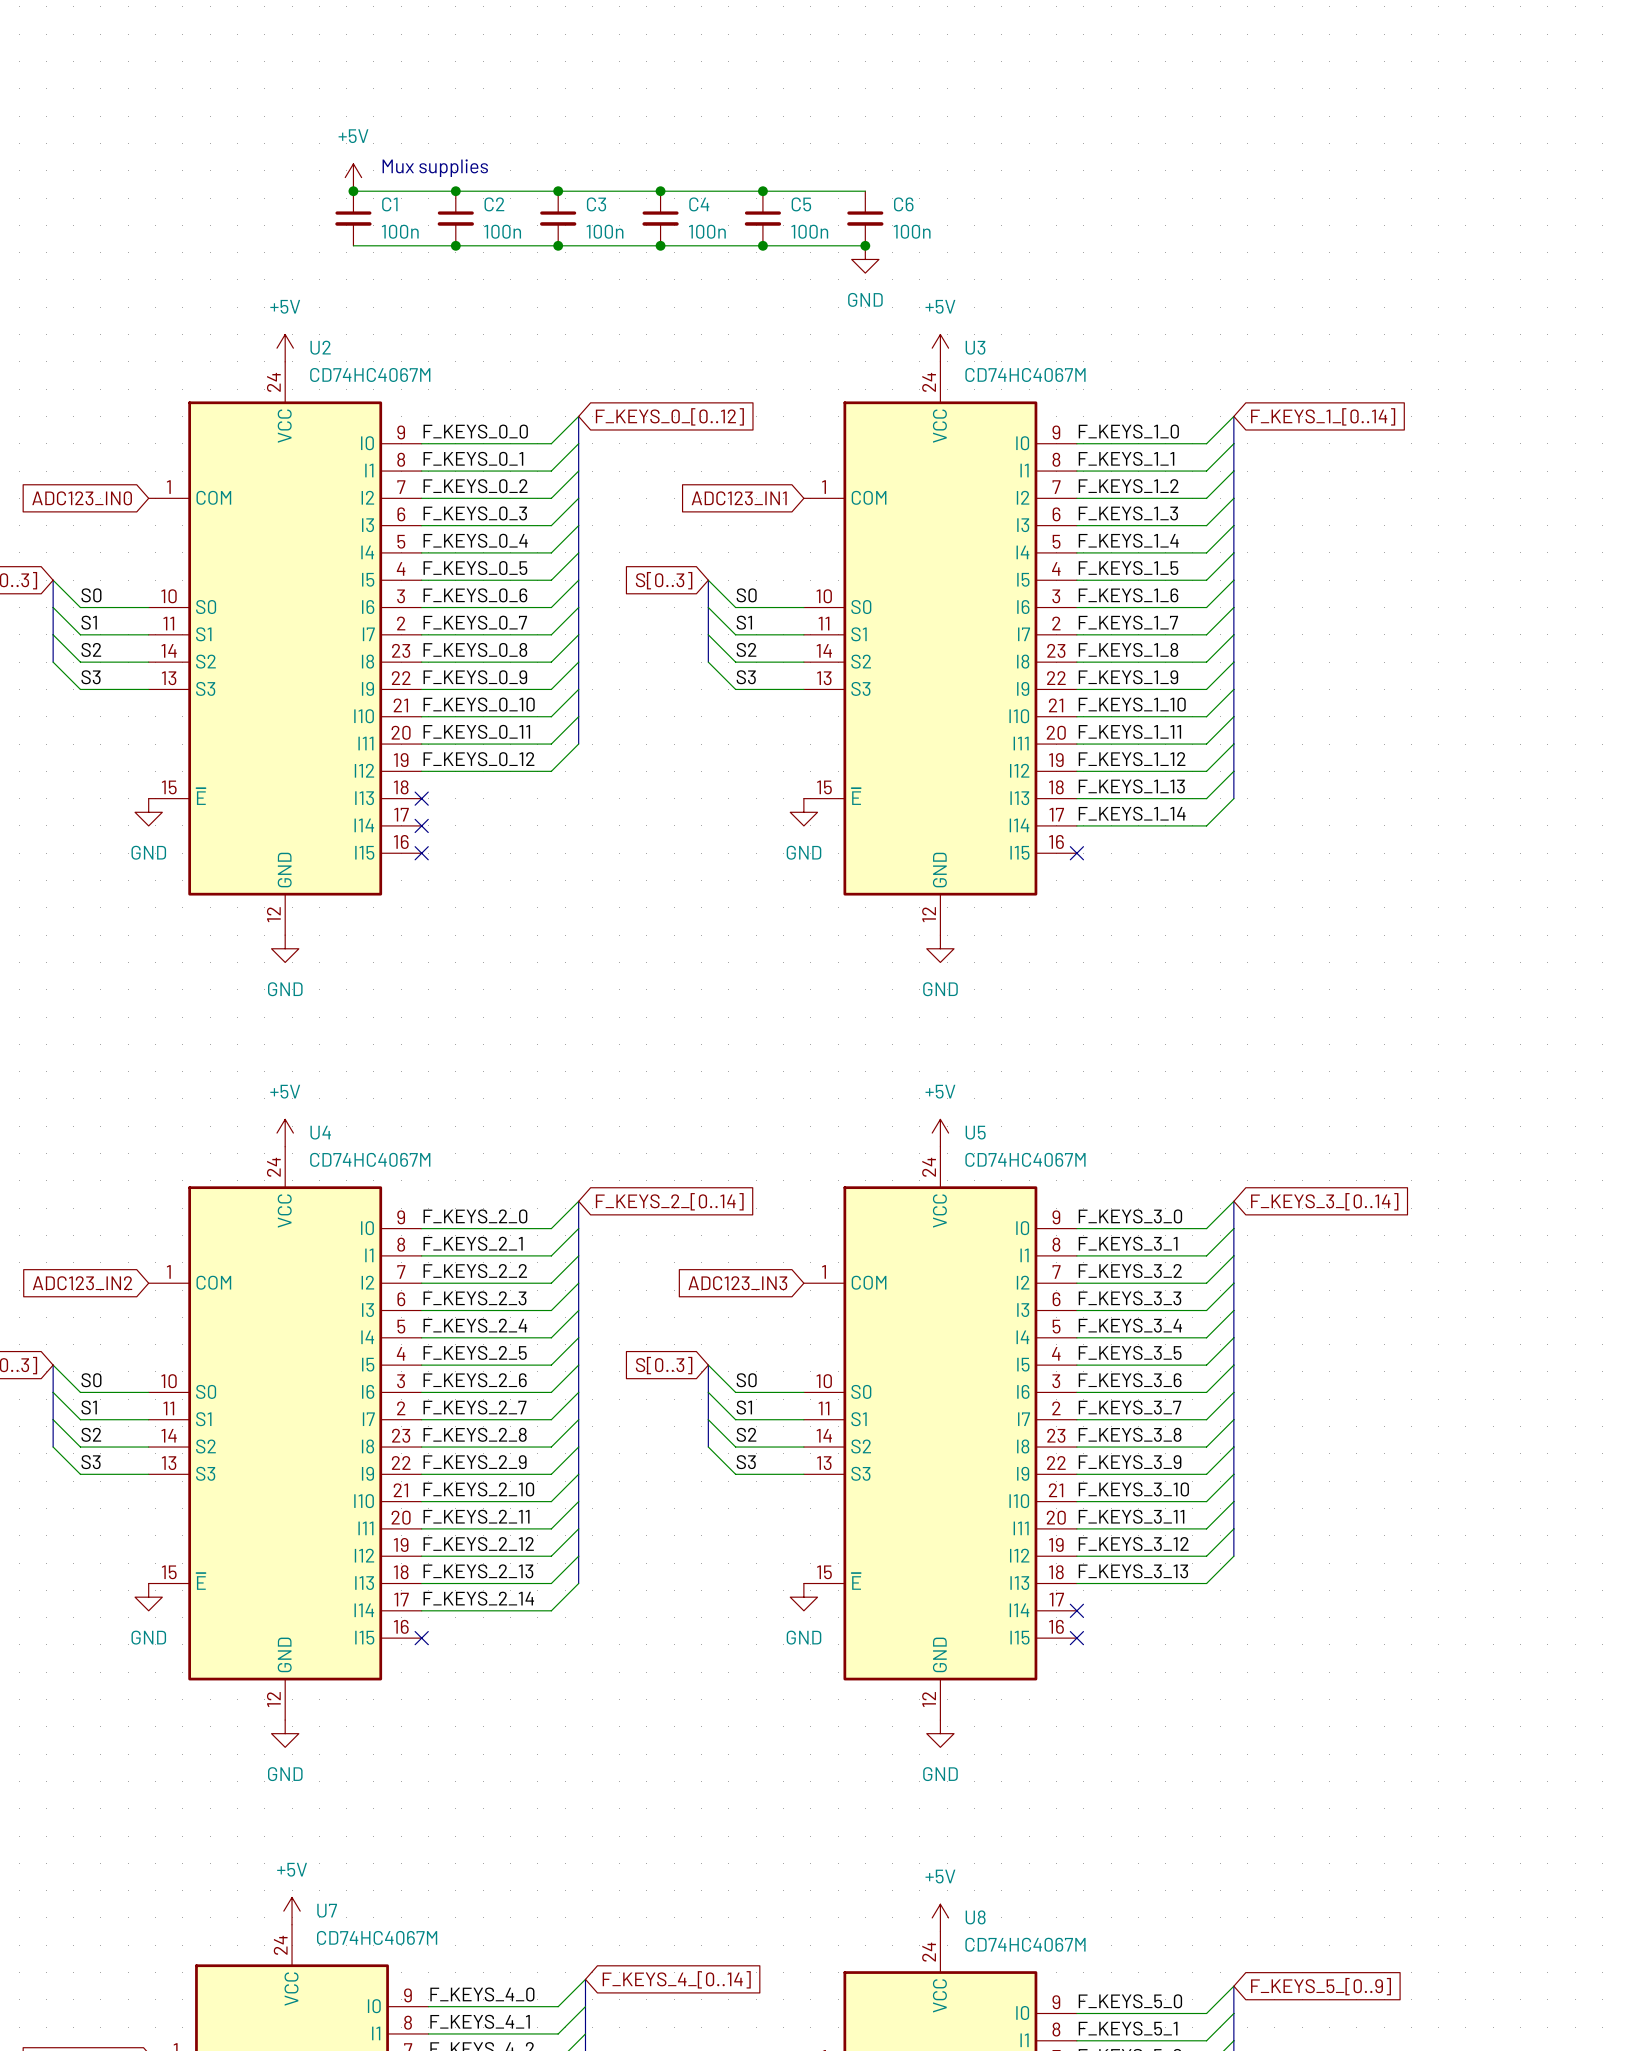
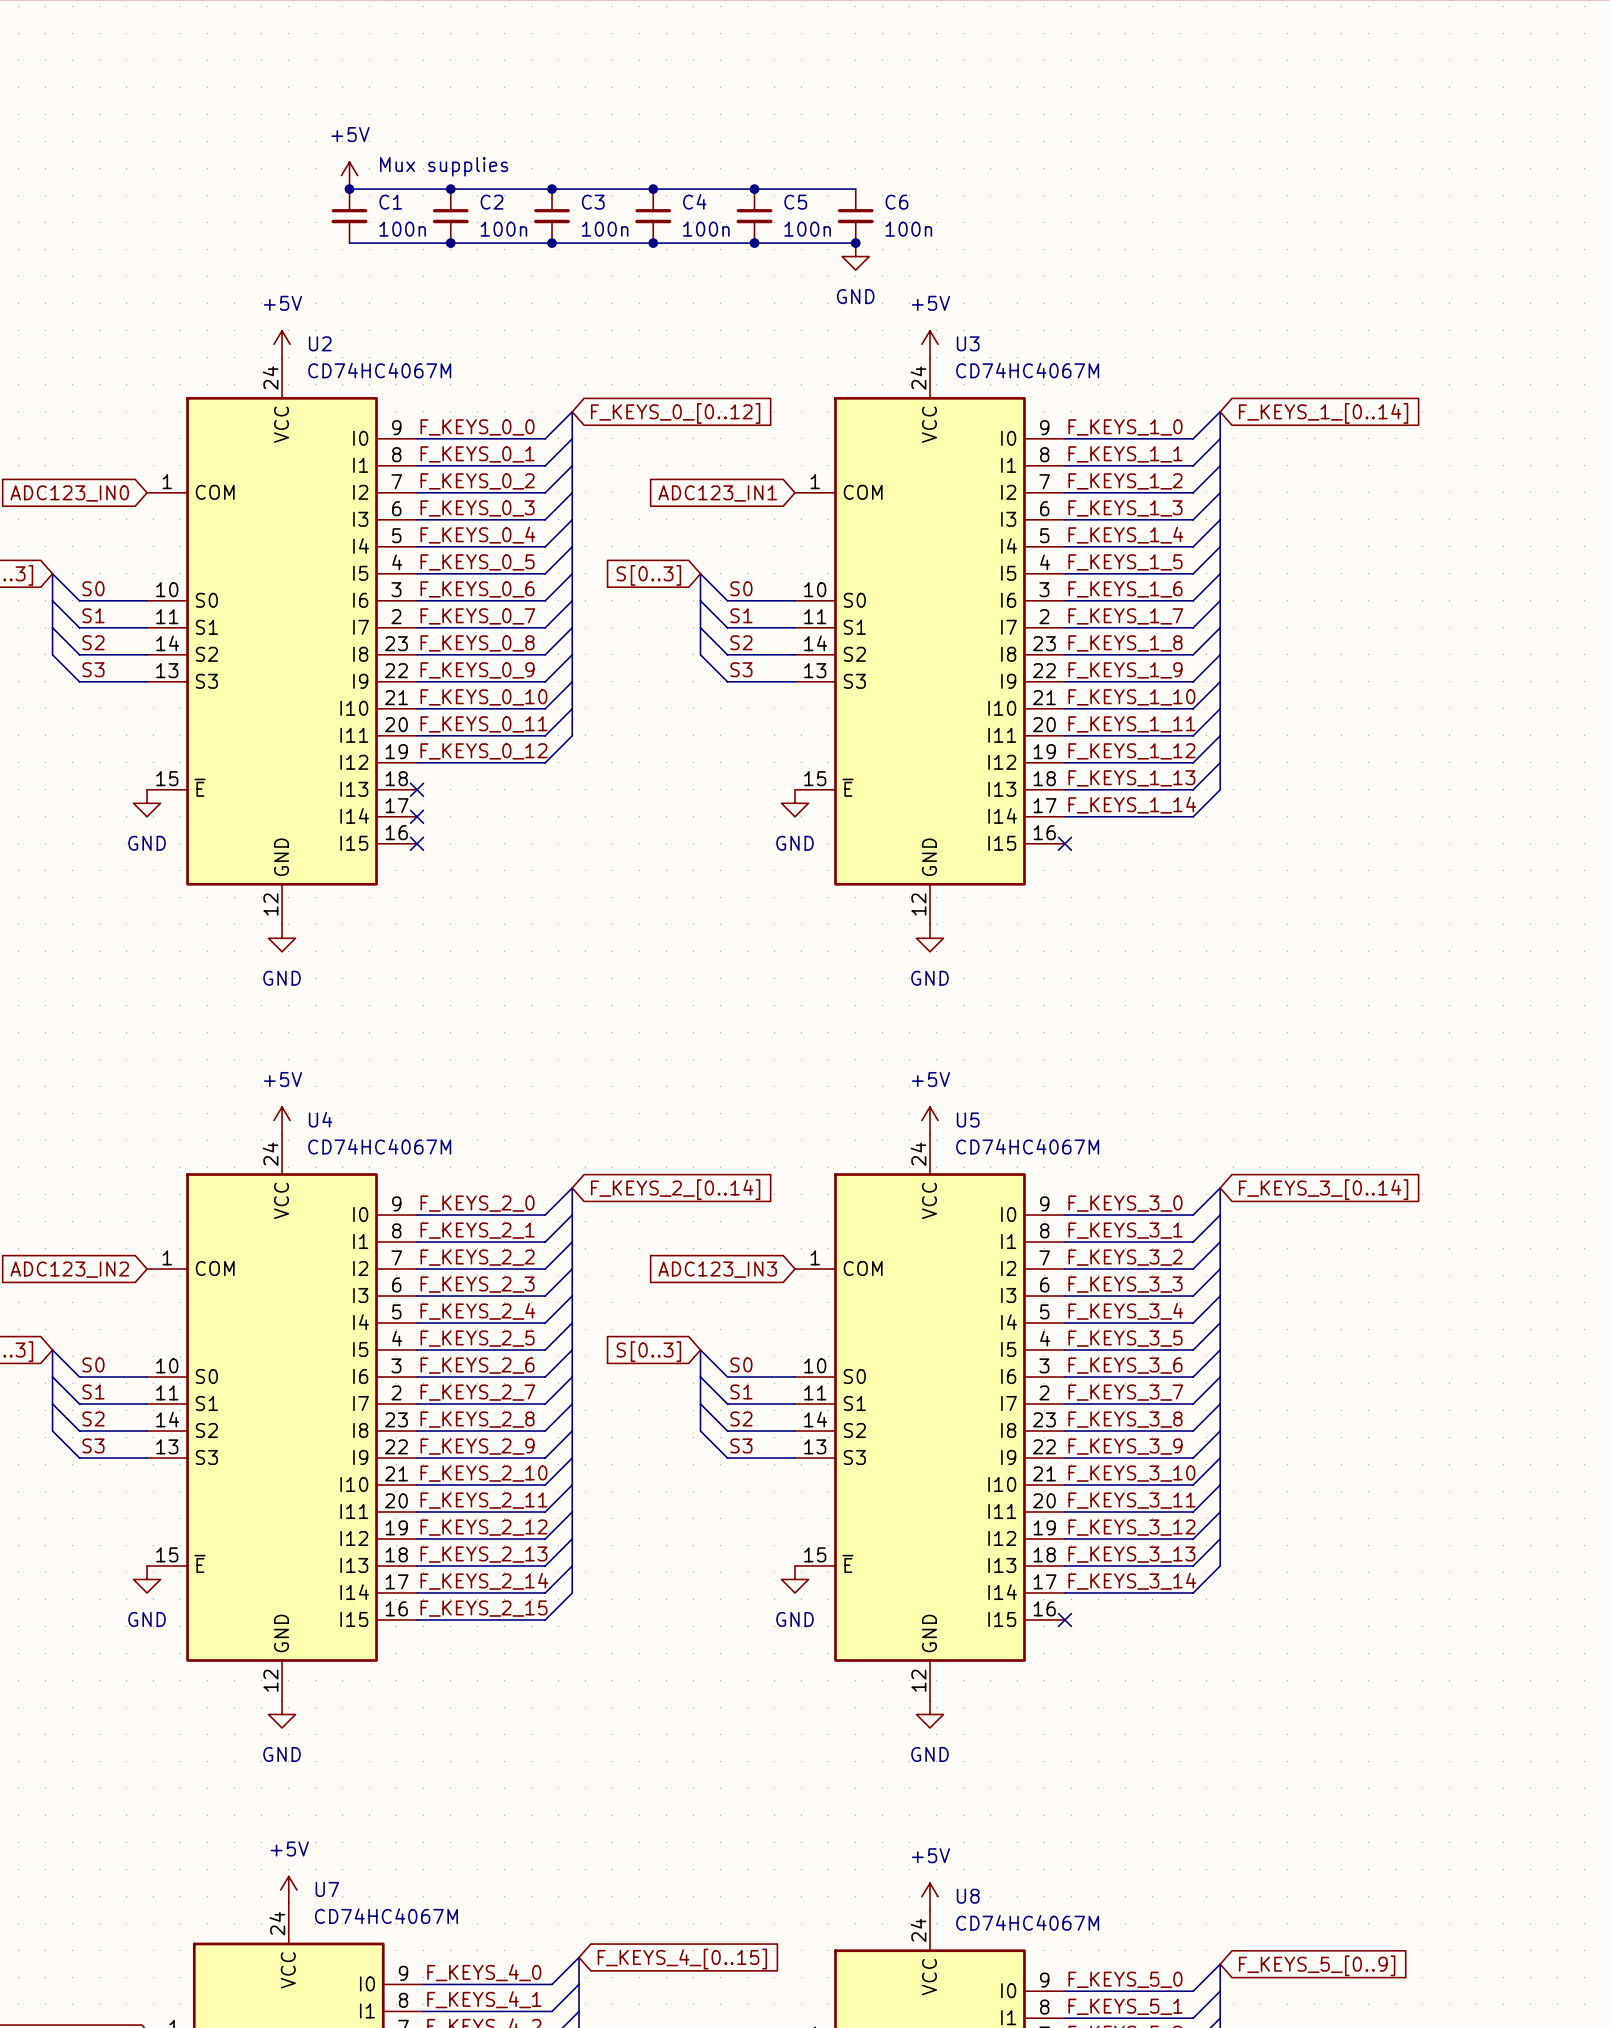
bus: none -> (1220, 1538) (1220, 1565)
bus: none -> (572, 1565) (572, 1592)
wire: none -> (1220, 1565) (1193, 1592) (1064, 1592)
label: none -> F_KEYS_3_14 (1132, 1581)
wire: none -> (572, 1592) (545, 1619) (417, 1619)
no-connect mark: (1076, 1610) -> none
label: none -> F_KEYS_2_15 (483, 1608)
no-connect mark: (421, 1638) -> none
global label: F_KEYS_4_[0..14] (676, 1979) -> F_KEYS_4_[0..15] (682, 1959)

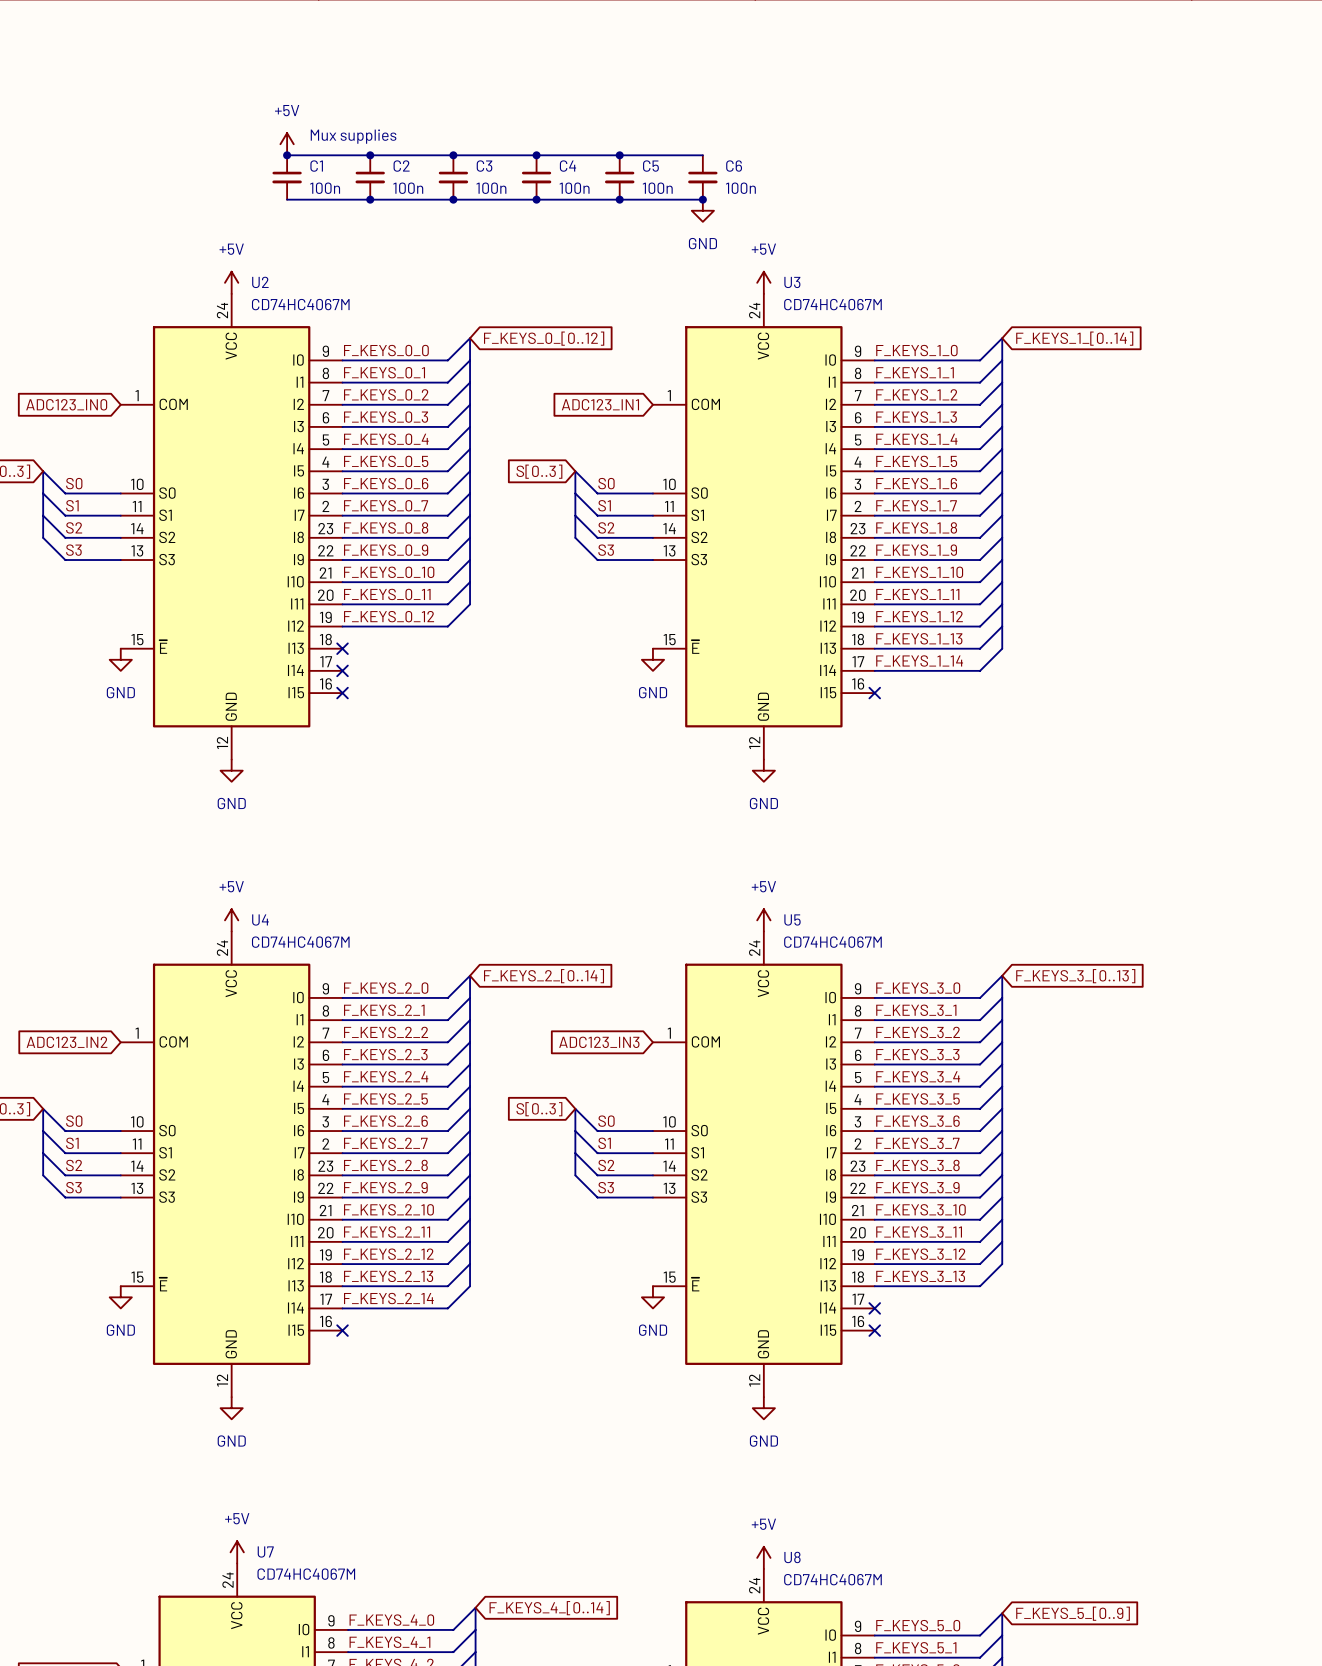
global label: F_KEYS_3_[0..14] (1323, 1189) -> F_KEYS_3_[0..13] (1075, 976)
bus: (1220, 1538) (1220, 1565) -> none
bus: (572, 1565) (572, 1592) -> none
wire: (1220, 1565) (1193, 1592) (1064, 1592) -> none
label: F_KEYS_3_14 (1132, 1581) -> none
wire: (572, 1592) (545, 1619) (417, 1619) -> none
no-connect mark: none -> (874, 1308)
label: F_KEYS_2_15 (483, 1608) -> none
no-connect mark: none -> (342, 1330)
global label: F_KEYS_4_[0..15] (682, 1959) -> F_KEYS_4_[0..14] (549, 1608)

